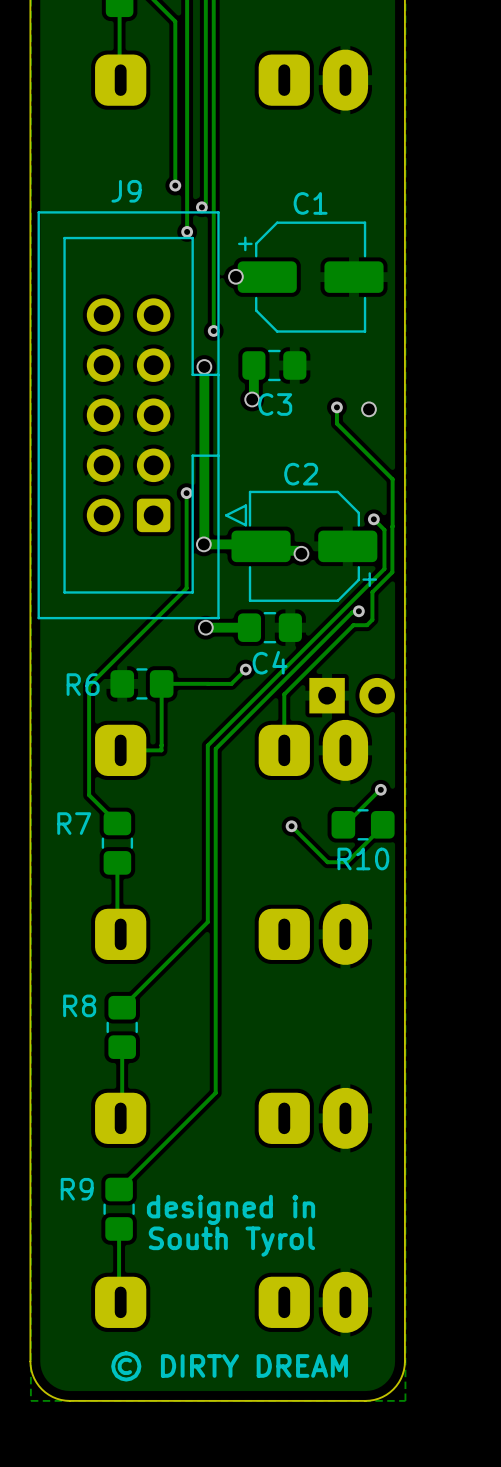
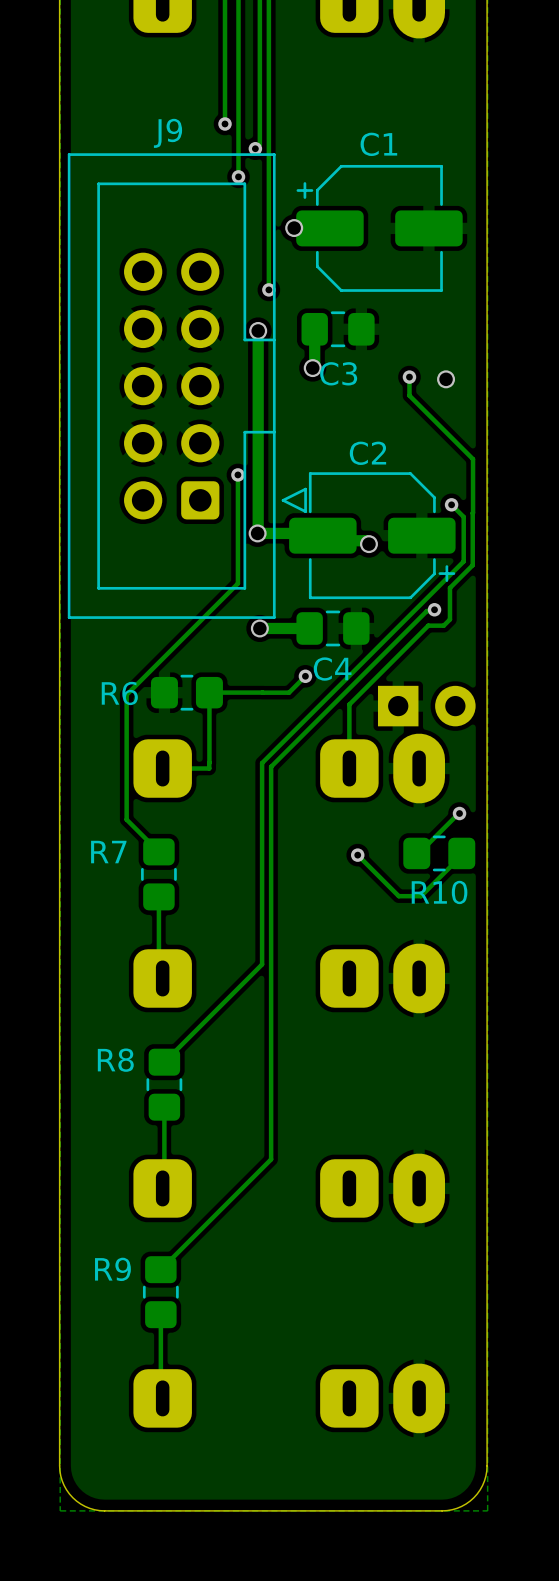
text: designed in (231, 1209) -> none
text: South Tyrol (231, 1241) -> none
text: © DIRTY DREAM (229, 1366) -> none

